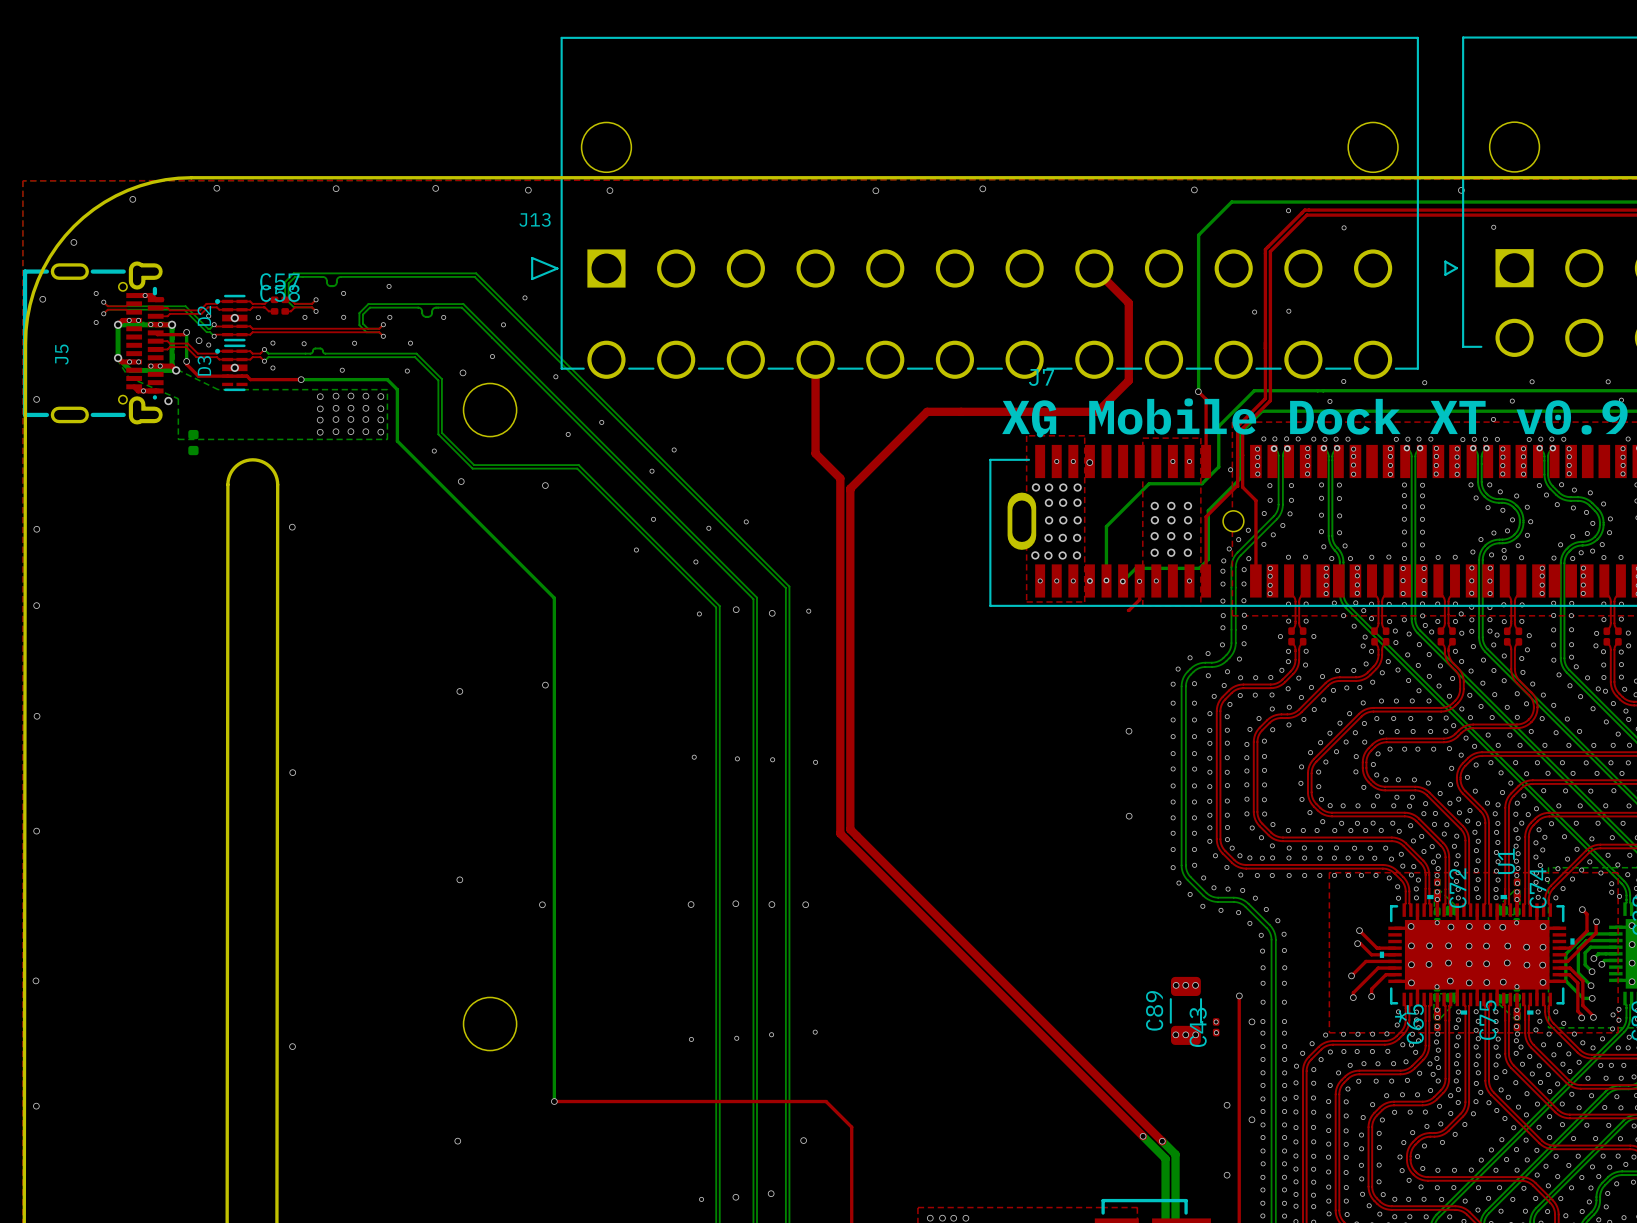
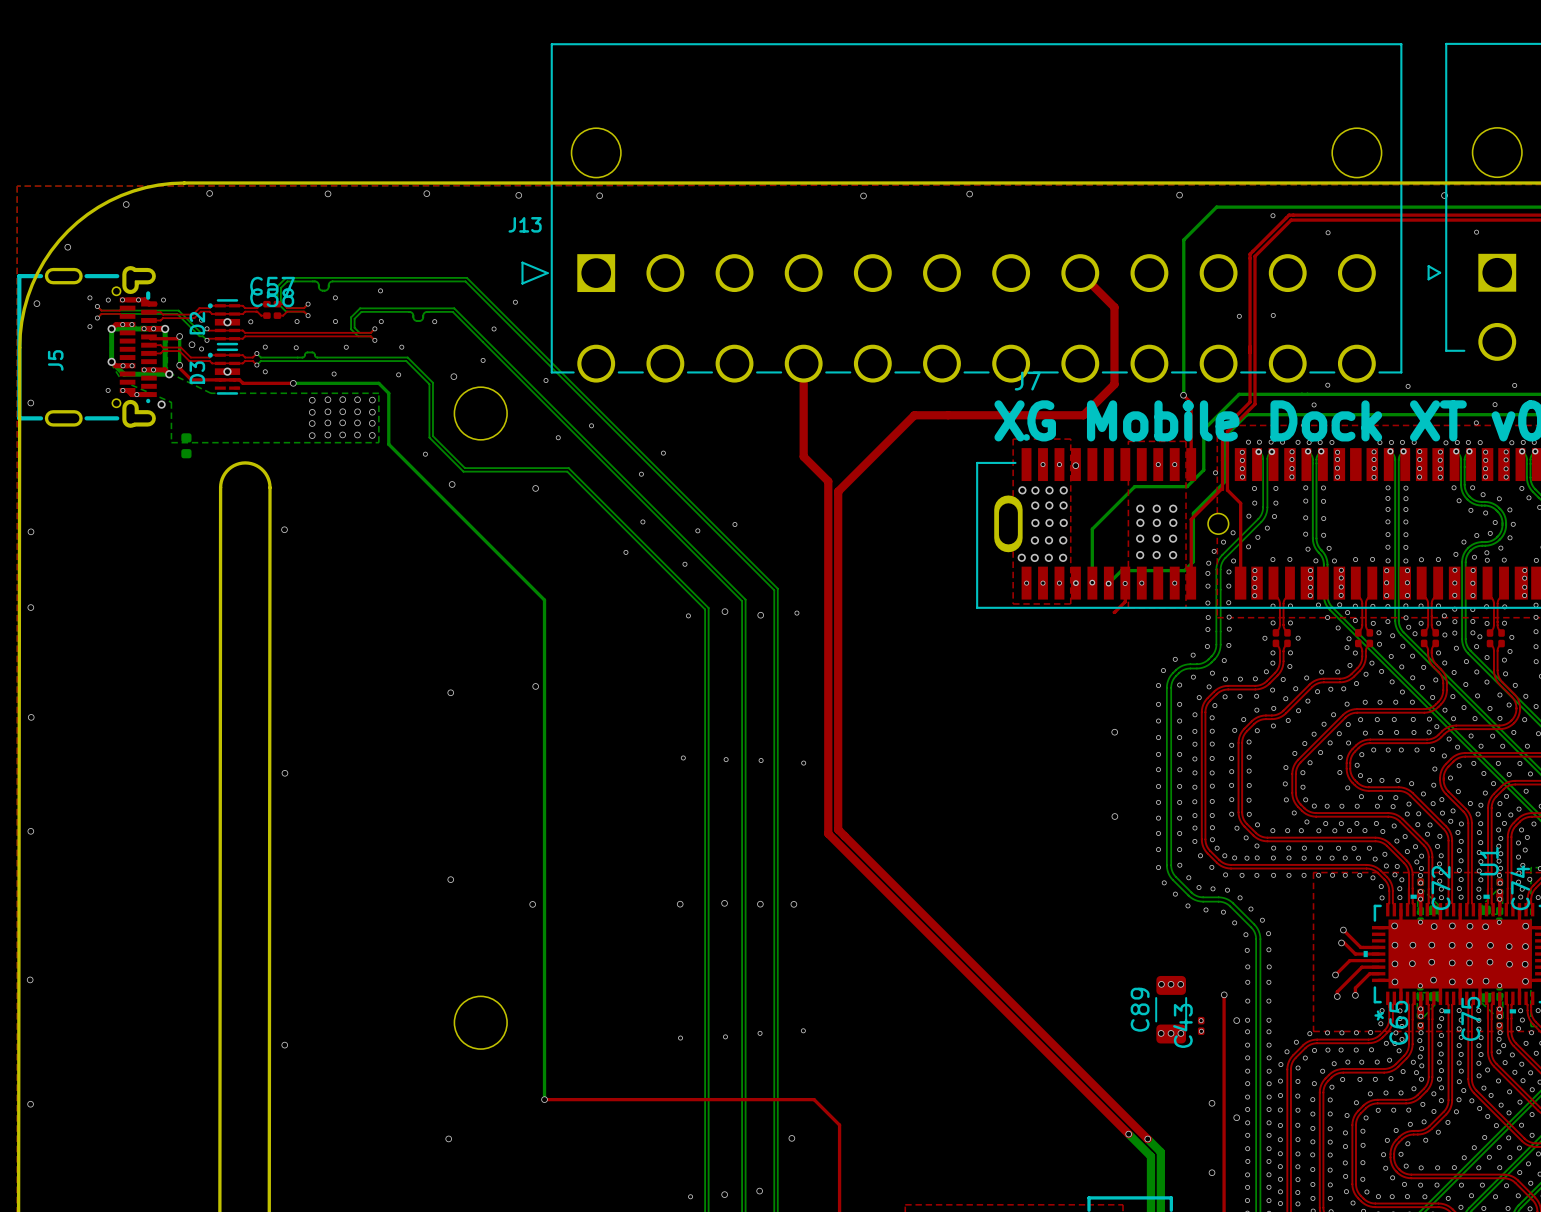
via: none -> (108, 300)
via: none -> (122, 299)
via: none -> (163, 300)
via: none -> (108, 390)
via: none -> (122, 390)

